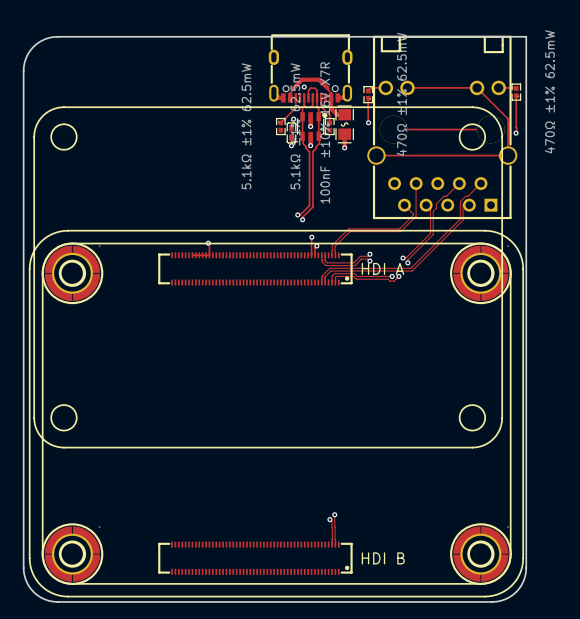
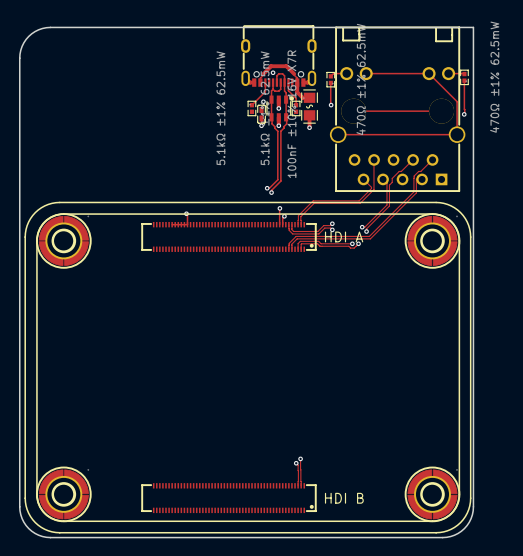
drawing: [33, 106, 504, 449] -> none

